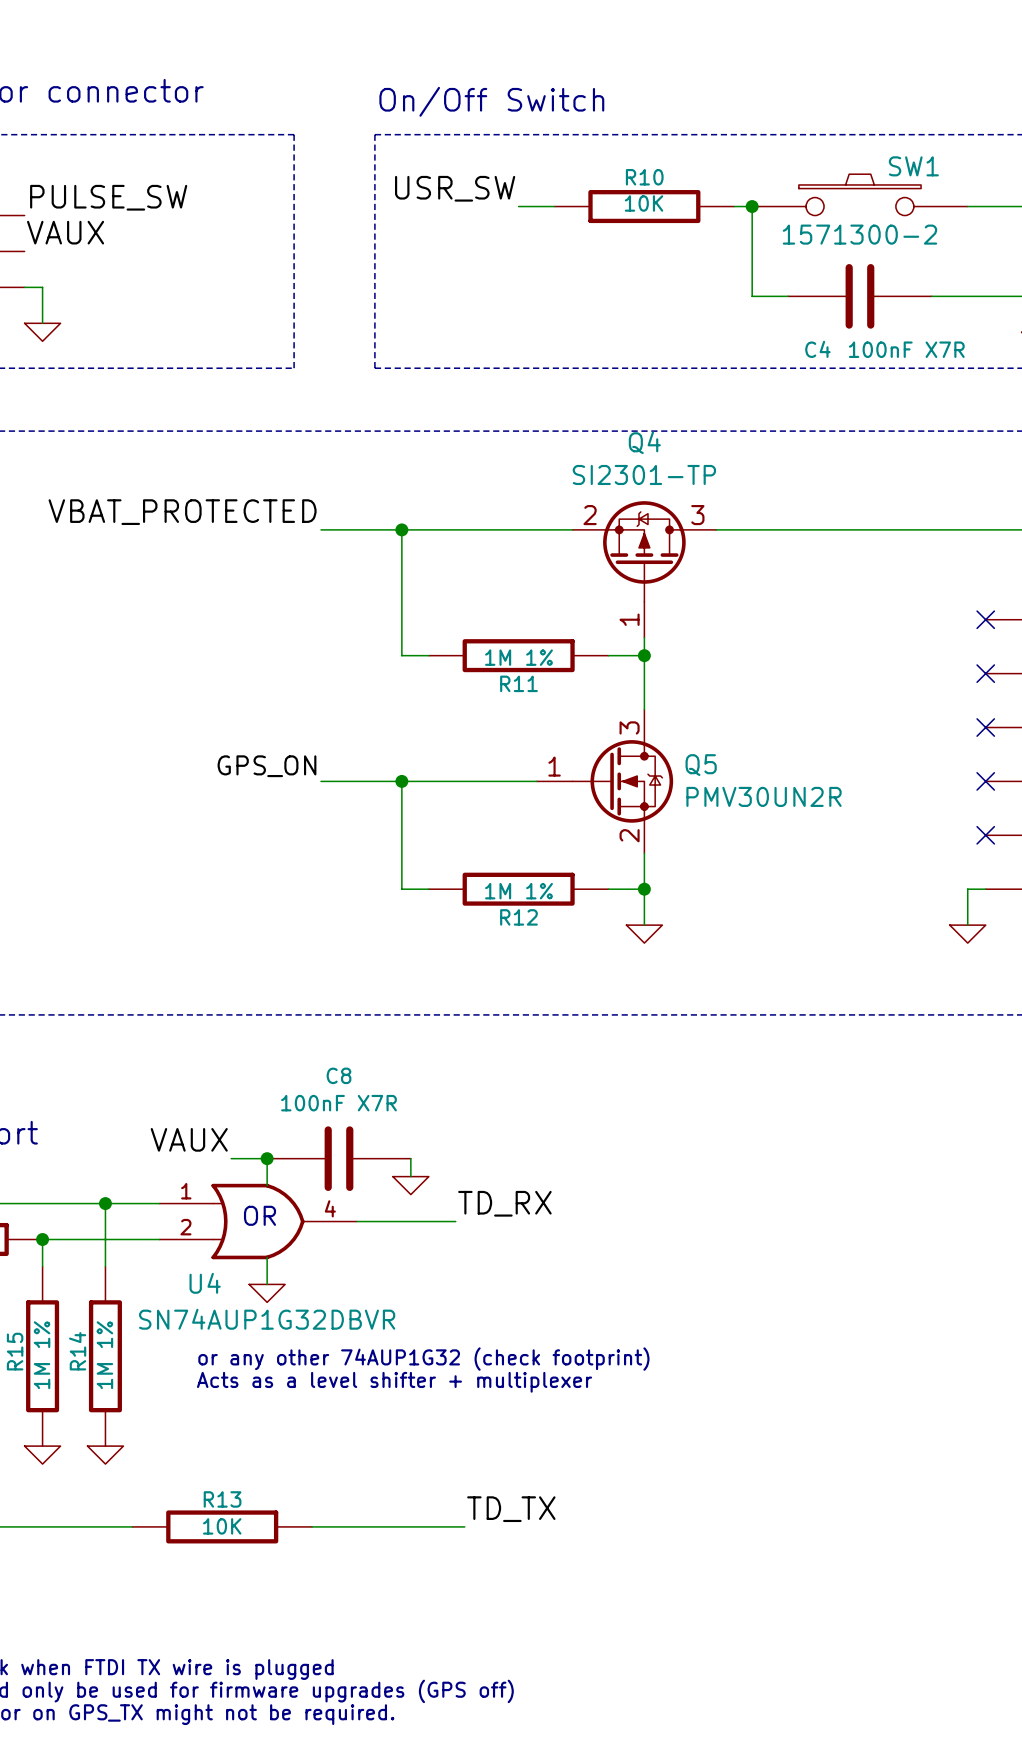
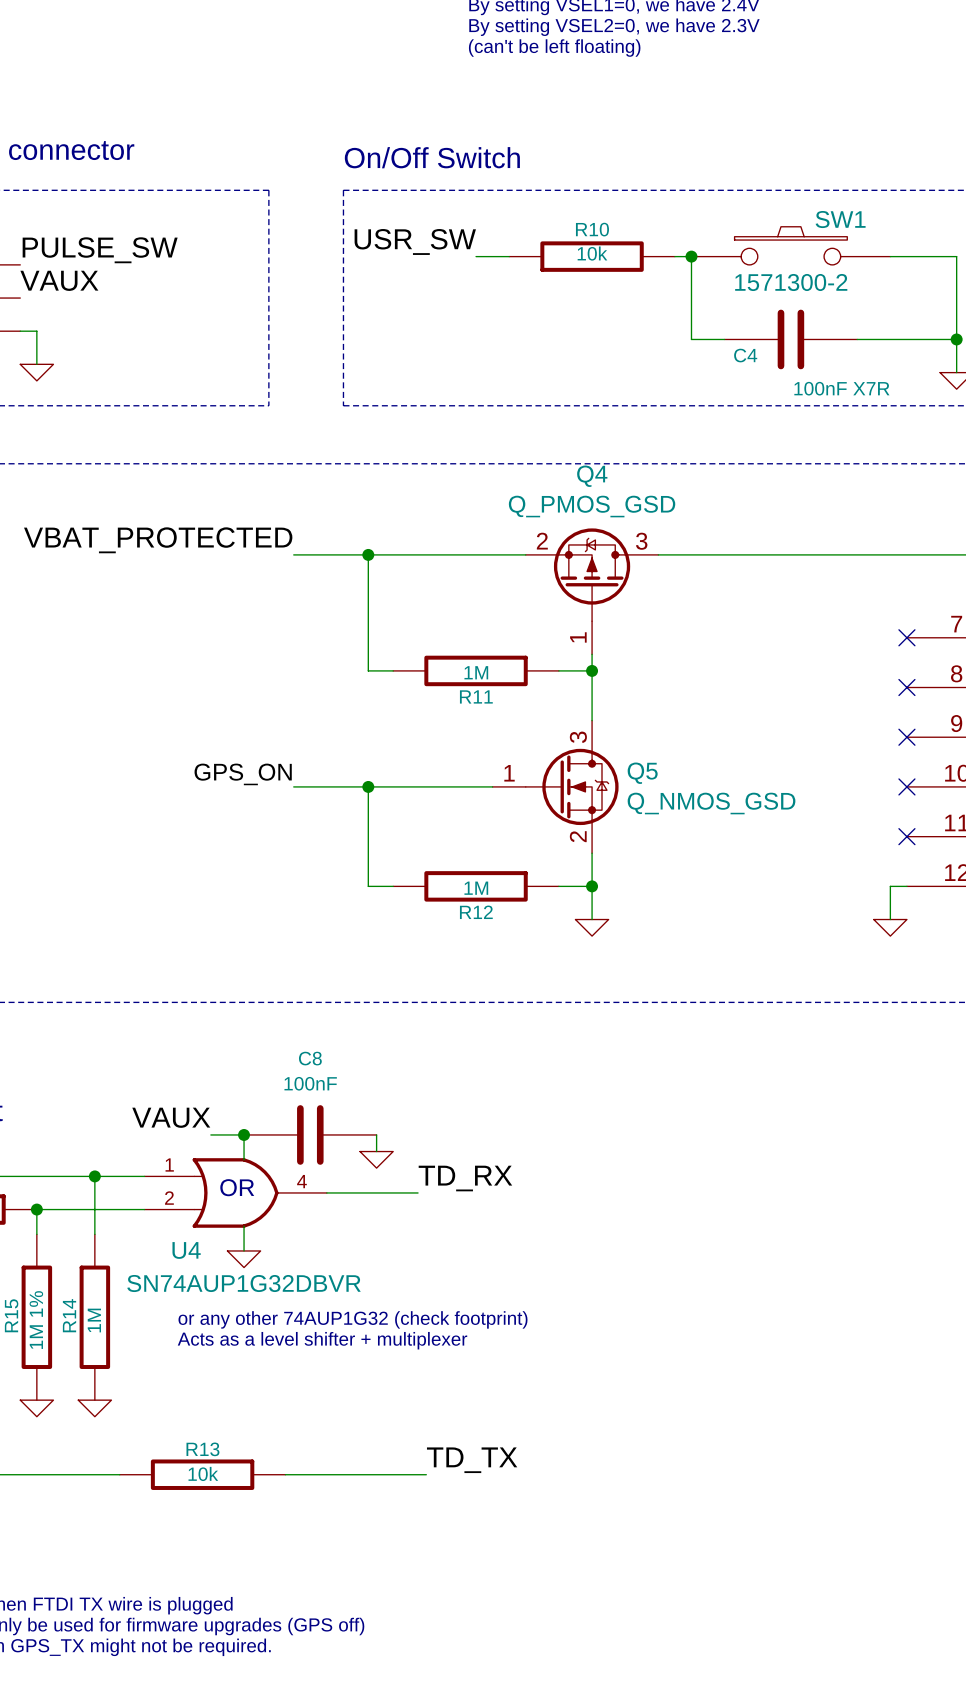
R10 value: 10K (644, 203) -> 10k (592, 253)
C4 name position: C4 (817, 349) -> C4 (745, 355)
Q4 value: SI2301-TP (644, 474) -> Q_PMOS_GSD (592, 506)
R11 value: 1M 1% (518, 657) -> 1M (476, 672)
Q5 value: PMV30UN2R (764, 796) -> Q_NMOS_GSD (711, 803)
R12 value: 1M 1% (518, 891) -> 1M (476, 888)
C8 value: 100nF X7R (338, 1103) -> 100nF (310, 1083)
R14 value: 1M 1% (104, 1355) -> 1M (94, 1320)
R13 value: 10K (222, 1526) -> 10k (203, 1473)

